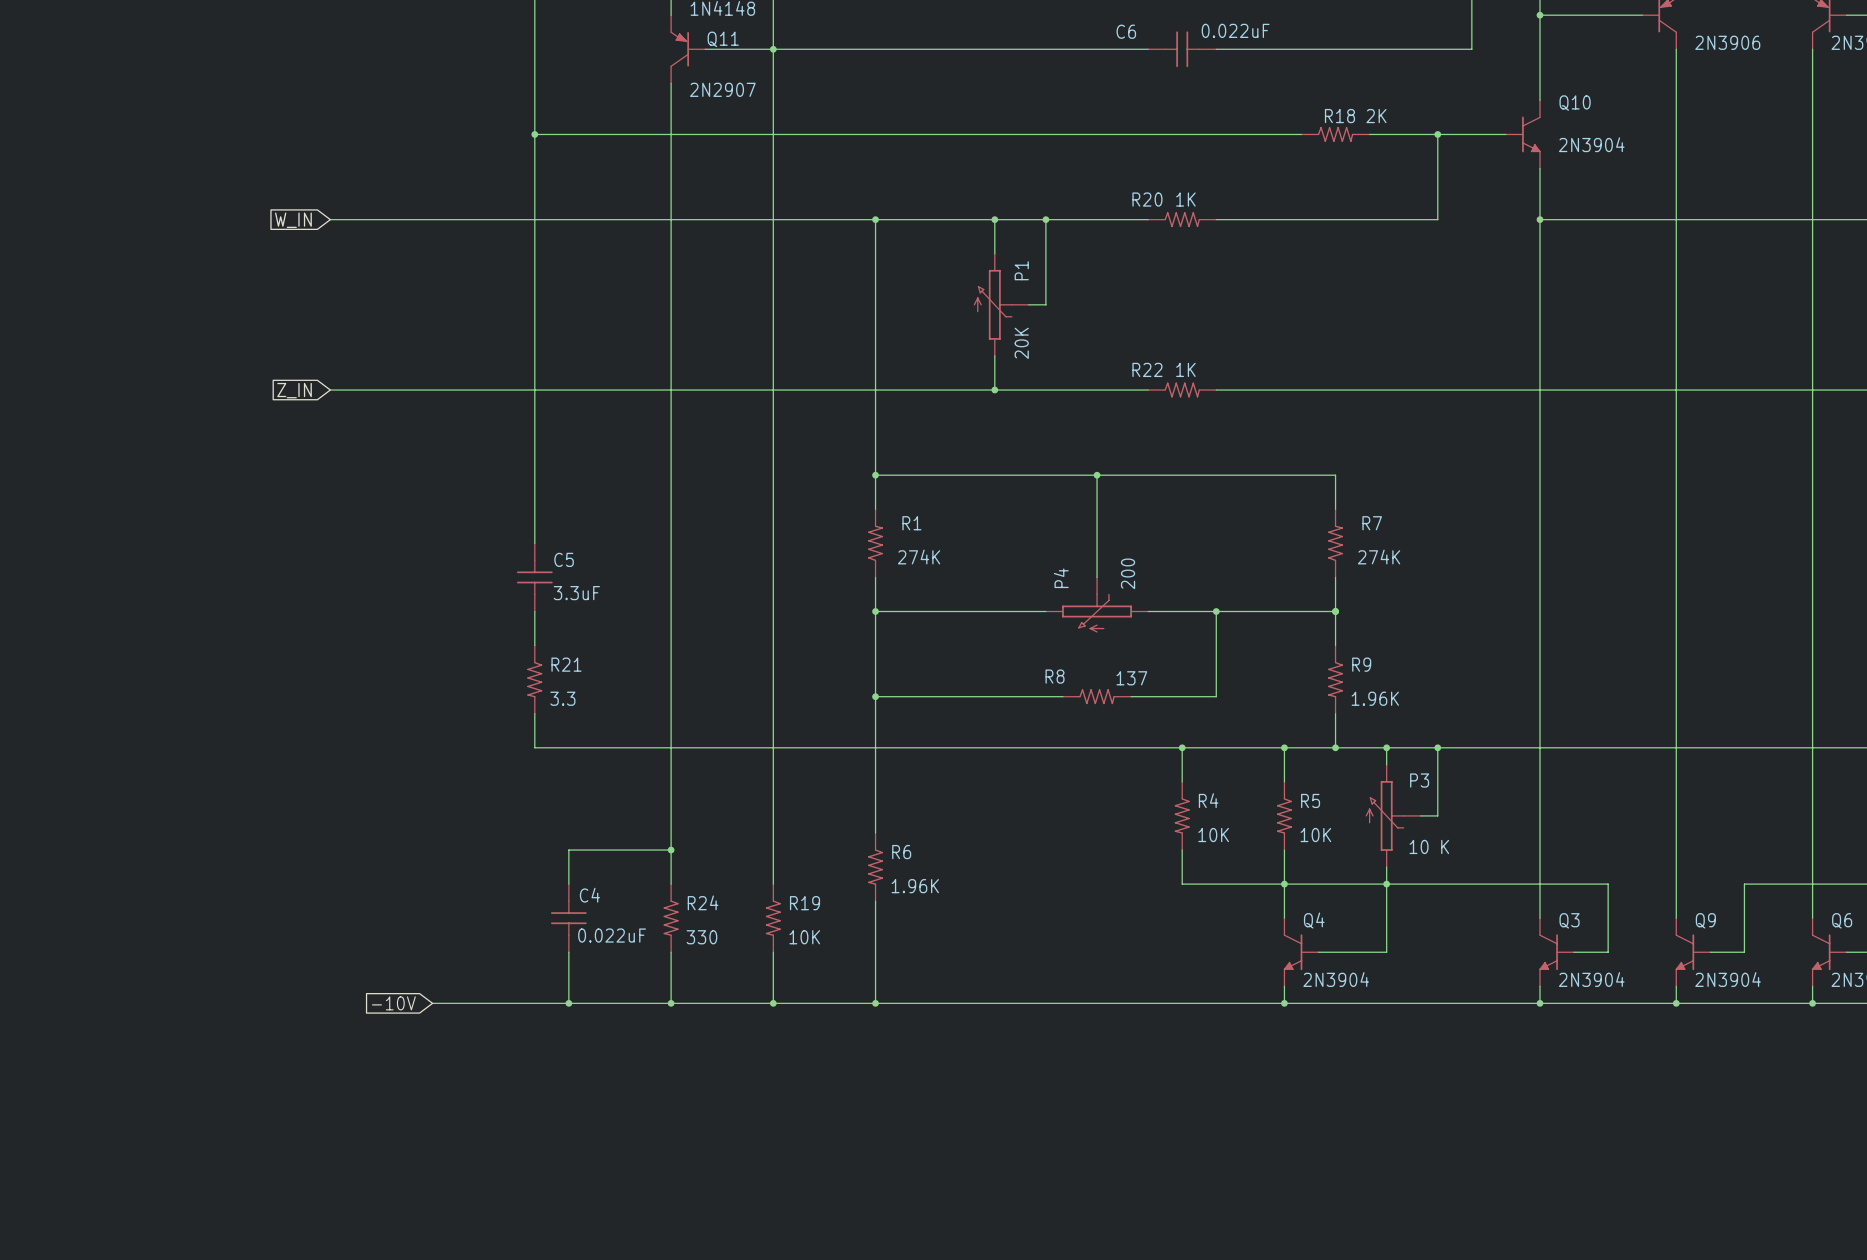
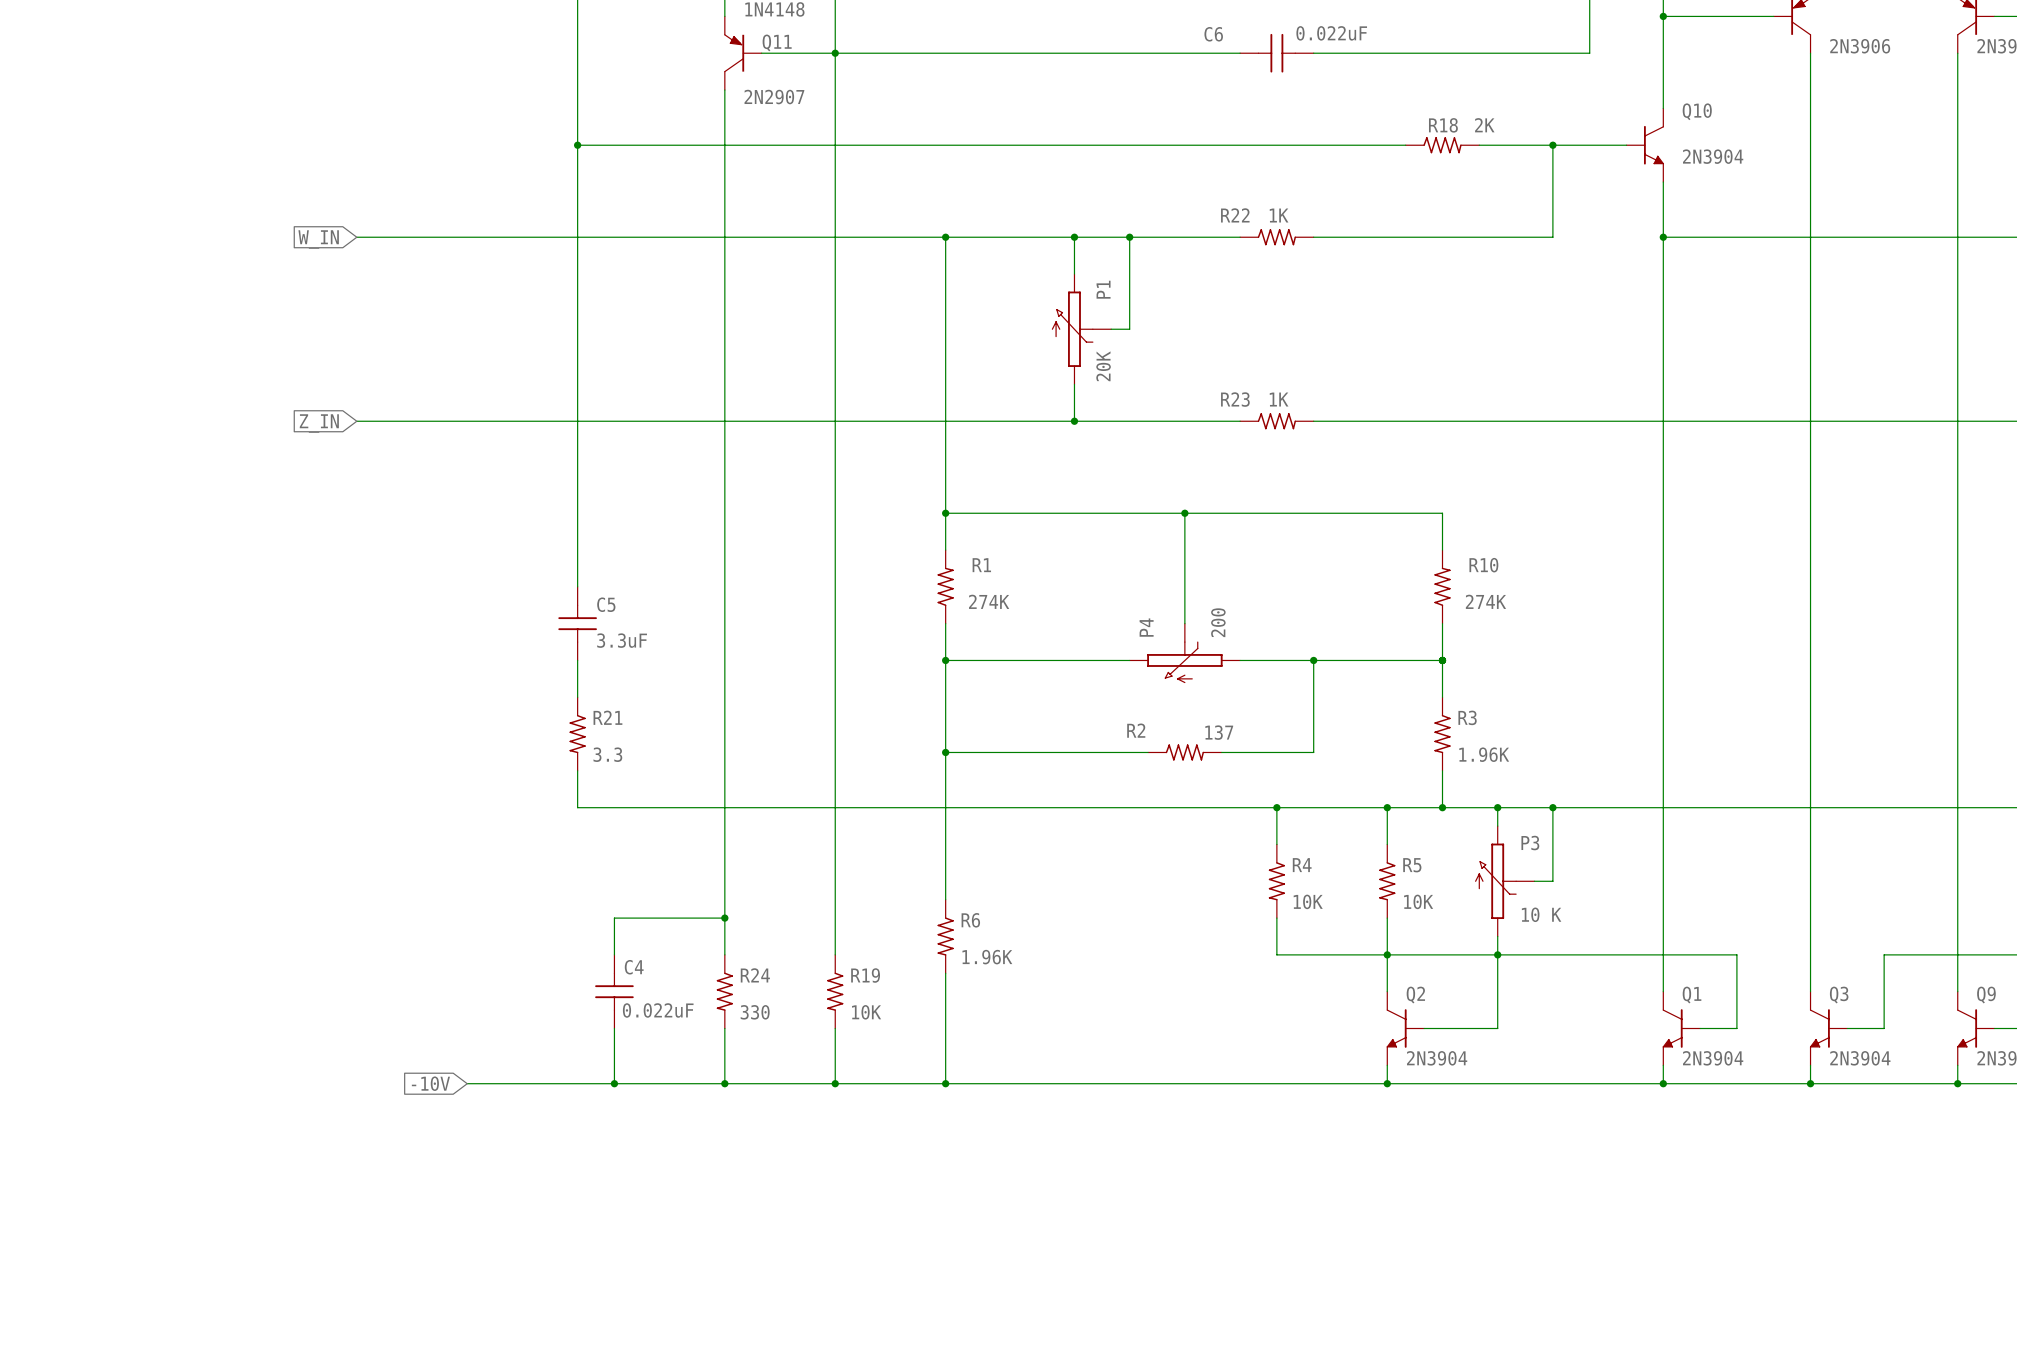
R20 name: R20 (1147, 199) -> R22 (1235, 215)
R22 name: R22 (1147, 369) -> R23 (1235, 399)
R7 name: R7 (1372, 523) -> R10 (1483, 565)
R9 name: R9 (1361, 664) -> R3 (1467, 717)
R8 name: R8 (1055, 676) -> R2 (1136, 730)
Q4 name: Q4 (1314, 920) -> Q2 (1415, 995)
Q3 name: Q3 (1569, 920) -> Q1 (1692, 995)
Q9 name: Q9 (1705, 920) -> Q3 (1839, 995)
Q6 name: Q6 (1842, 920) -> Q9 (1986, 995)

